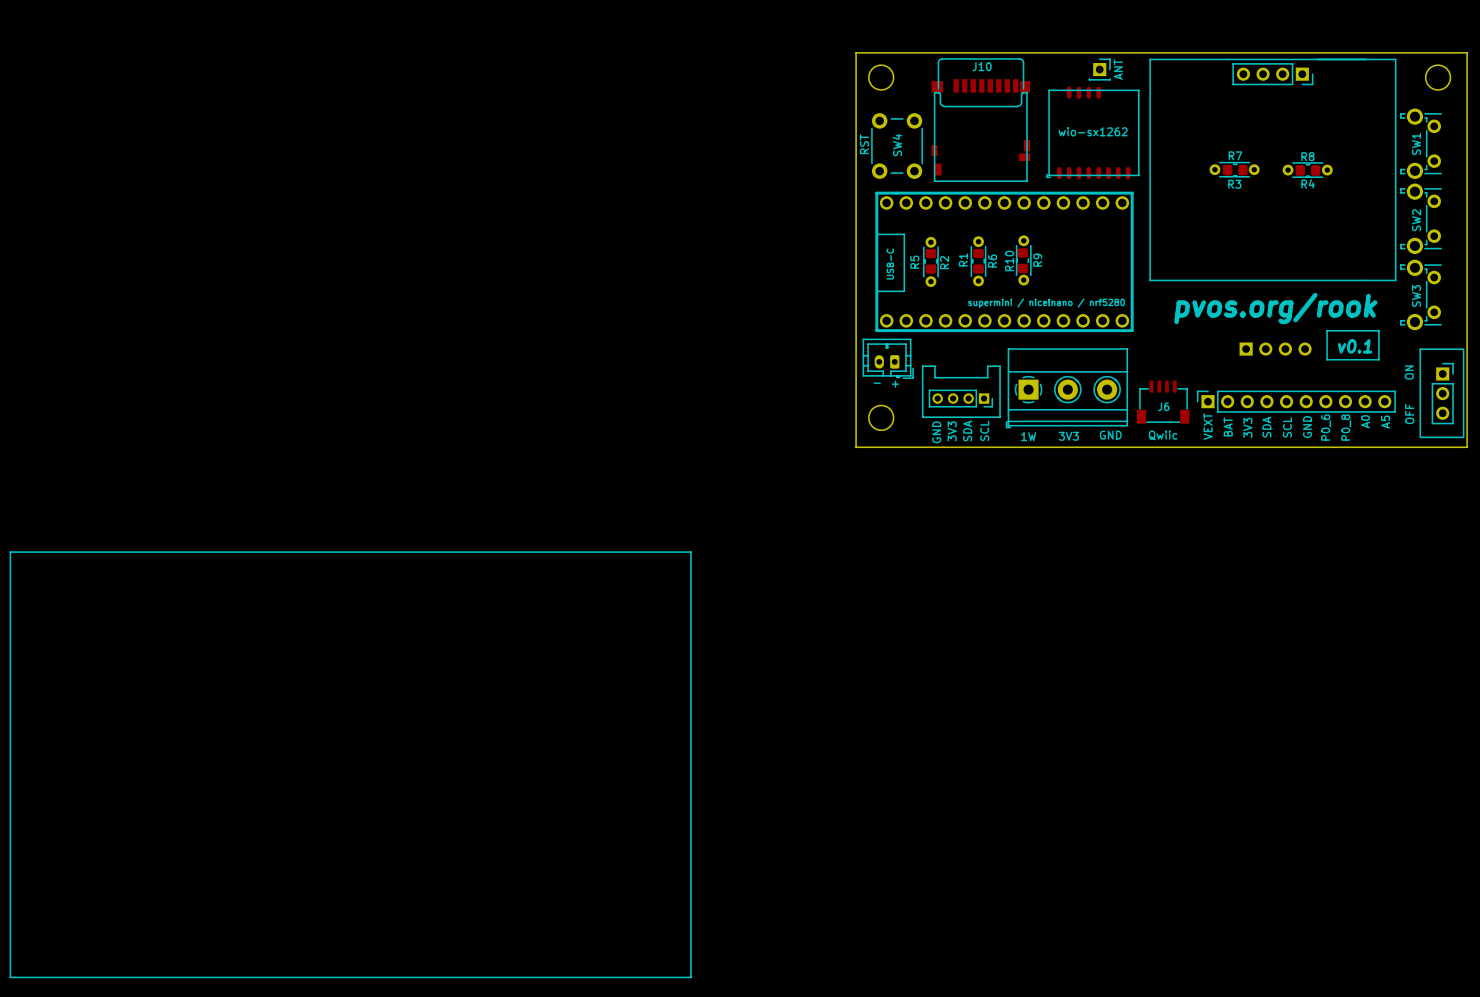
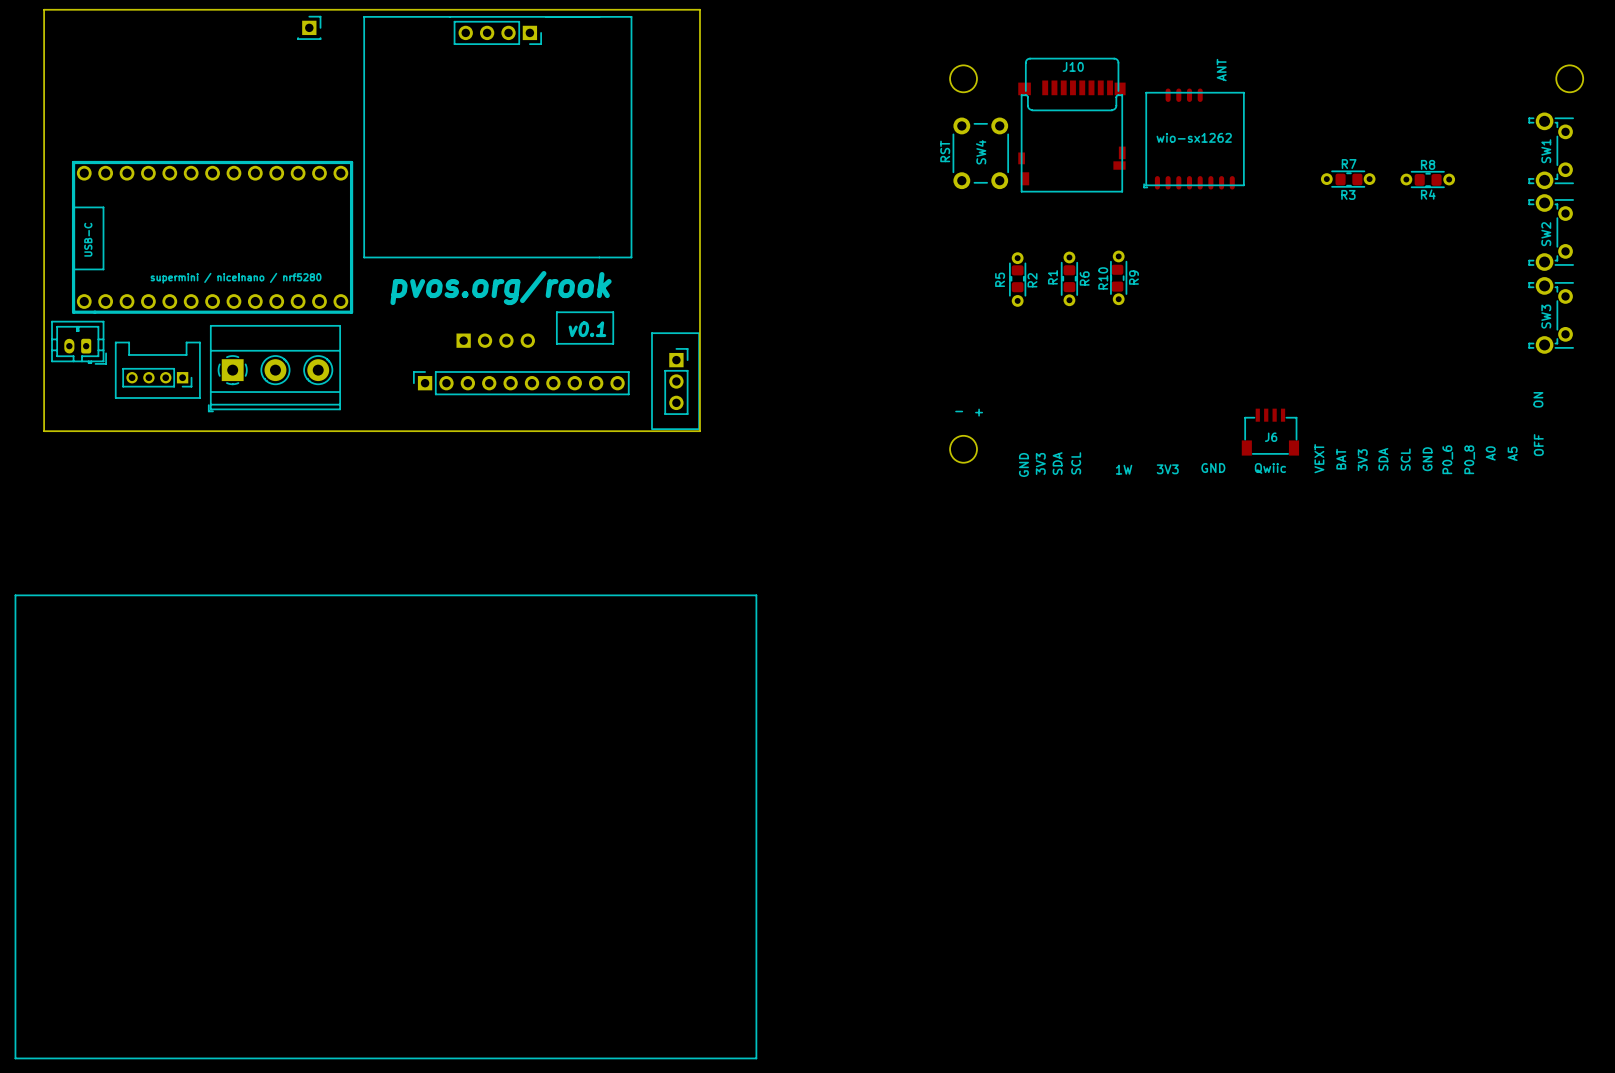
board edge: none -> (44, 9) (699, 9) (699, 431) (44, 431) (44, 9)
part: none -> (309, 27)
board edge: (856, 52) (1467, 52) (1467, 447) (856, 447) (856, 52) -> none
part: (1099, 69) -> none
part: none -> (497, 137)
part: (1272, 169) -> none
part: none -> (212, 237)
part: (1004, 261) -> none
text: none -> pvos.org/rook (501, 288)
line: none -> (556, 312) (613, 312) (613, 343) (556, 343) (556, 312)
text: none -> v0.1 (587, 329)
text: pvos.org/rook (1275, 308) -> none
part: none -> (495, 340)
part: none -> (79, 342)
line: (1327, 330) (1378, 330) (1378, 359) (1327, 359) (1327, 330) -> none
part: none -> (274, 368)
part: none -> (157, 370)
text: v0.1 (1355, 346) -> none
part: (1275, 349) -> none
part: none -> (675, 381)
part: none -> (521, 383)
part: (888, 358) -> none
part: (1066, 388) -> none
part: (961, 391) -> none
part: (1441, 393) -> none
part: (1296, 401) -> none

